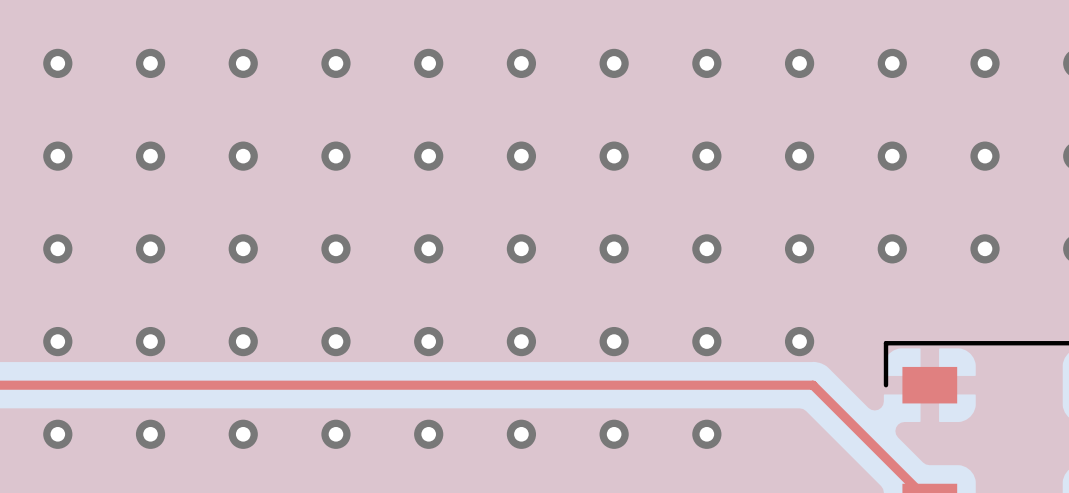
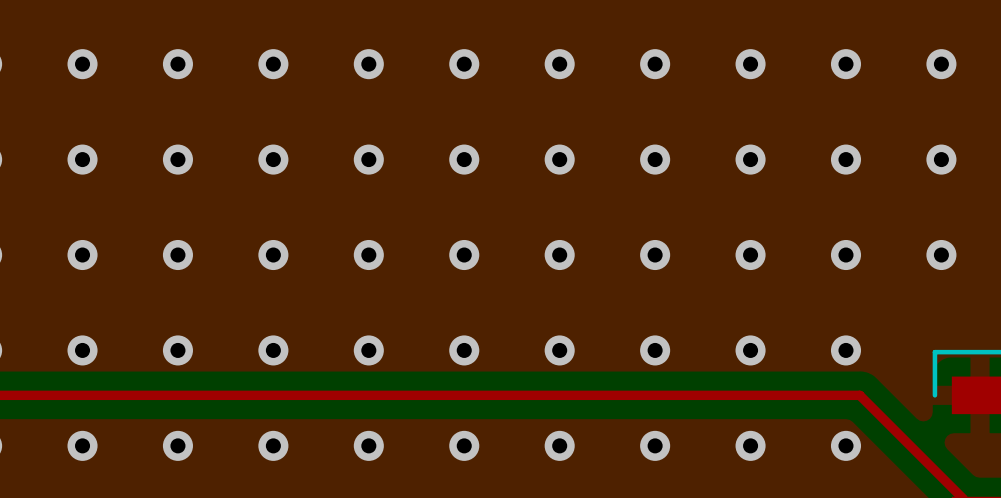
via: none -> (845, 445)

